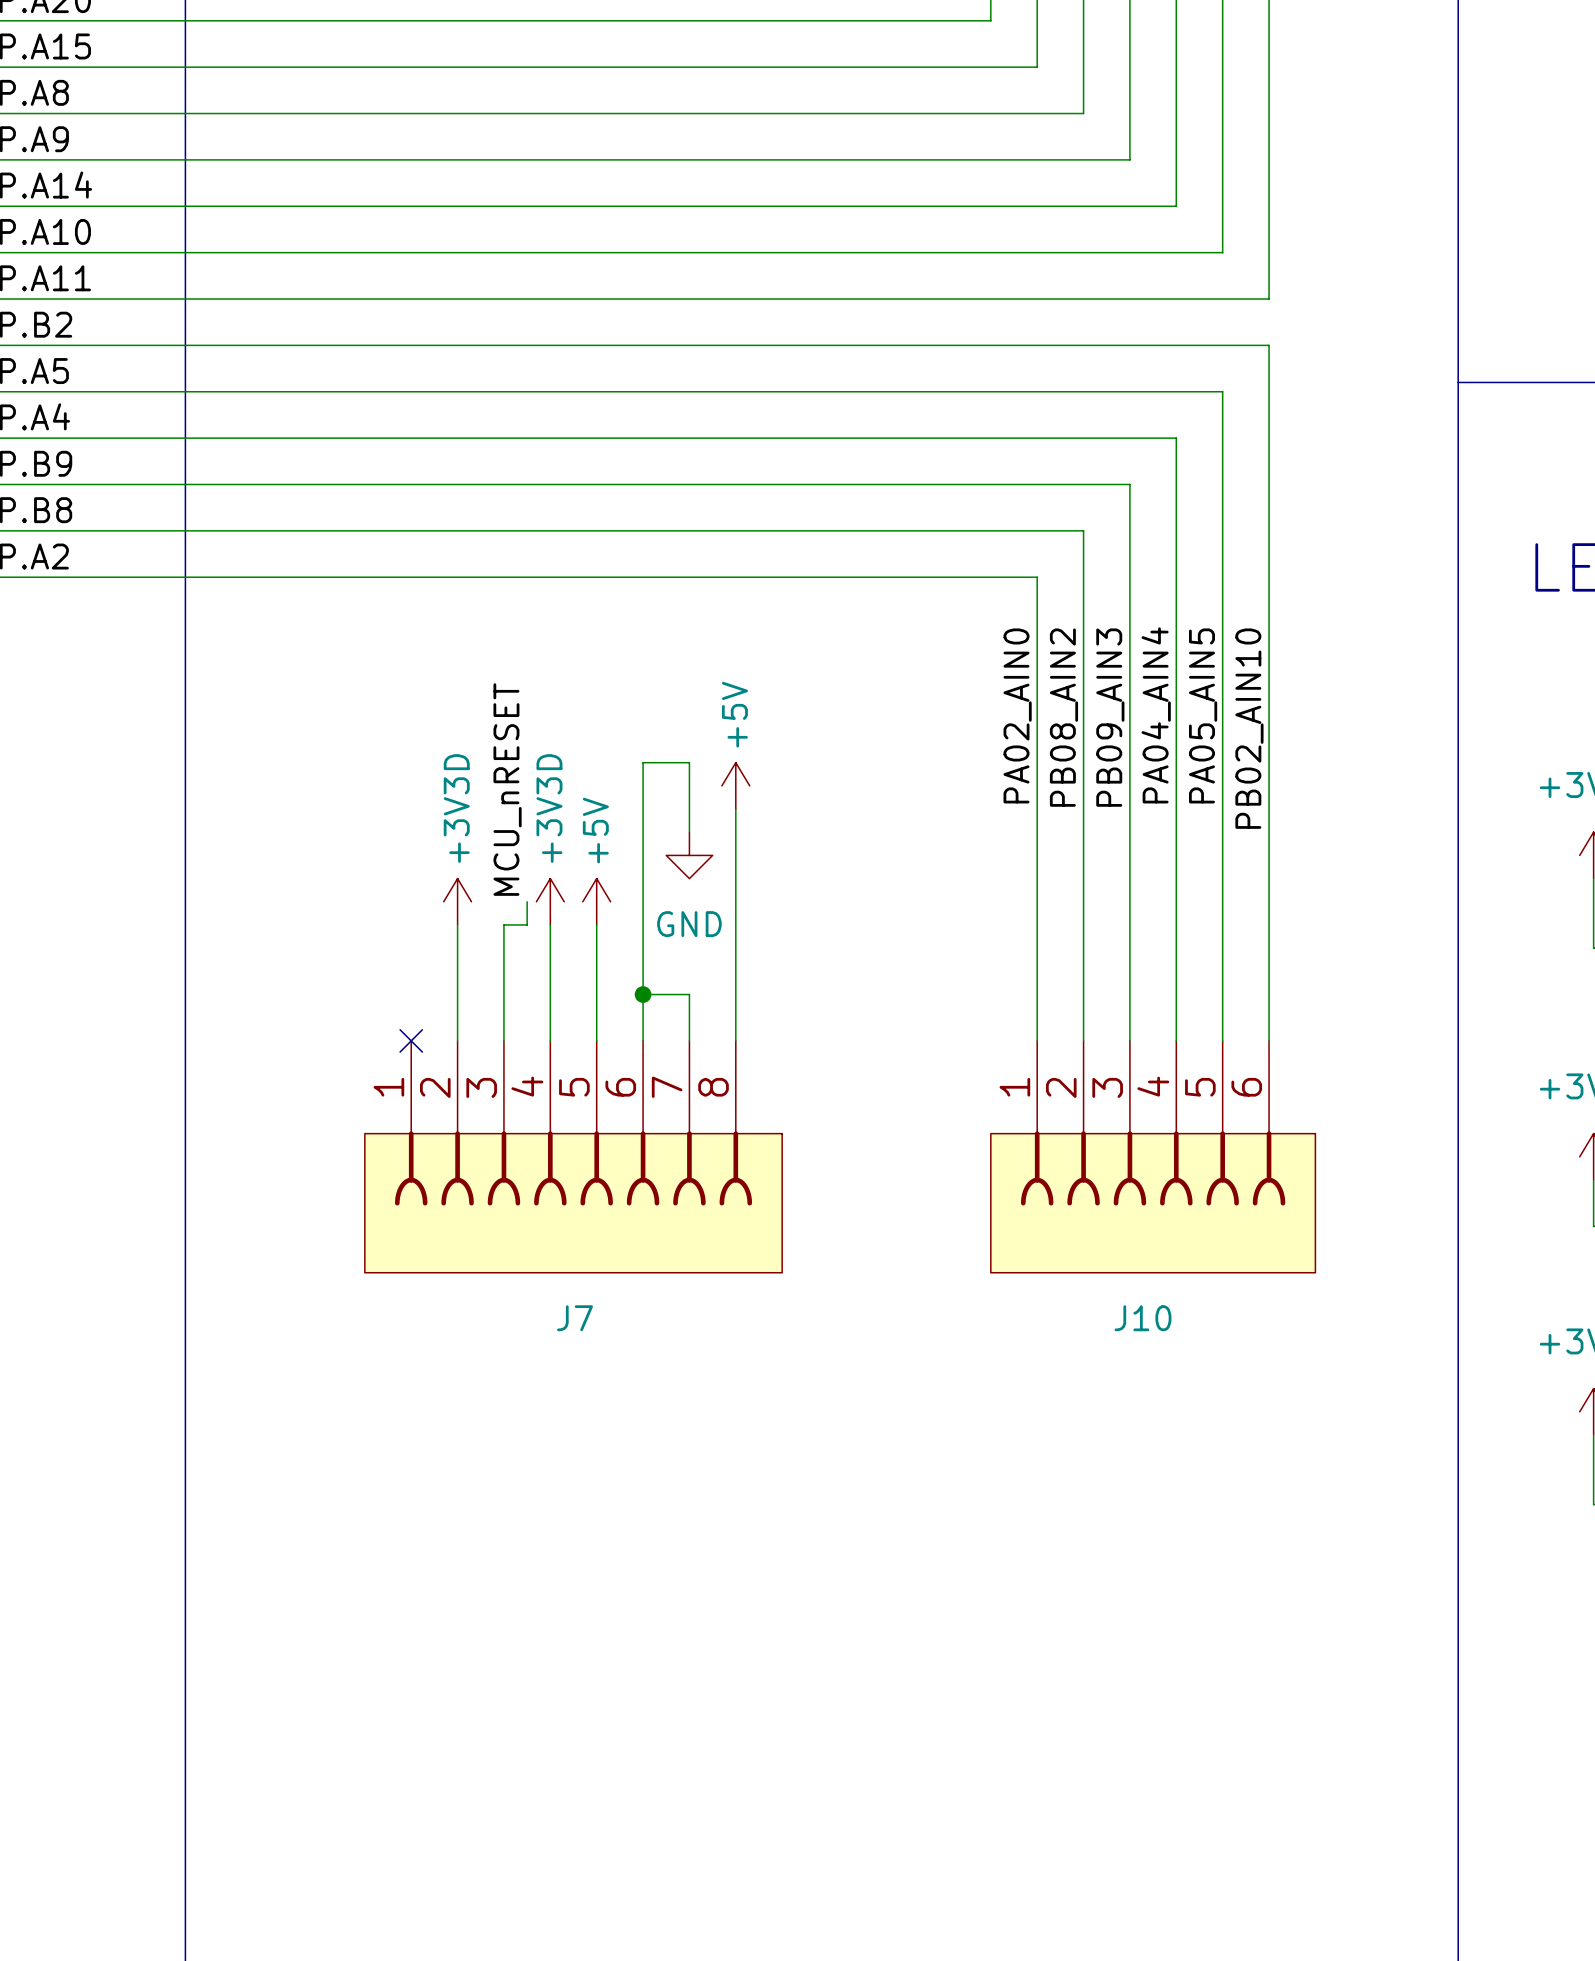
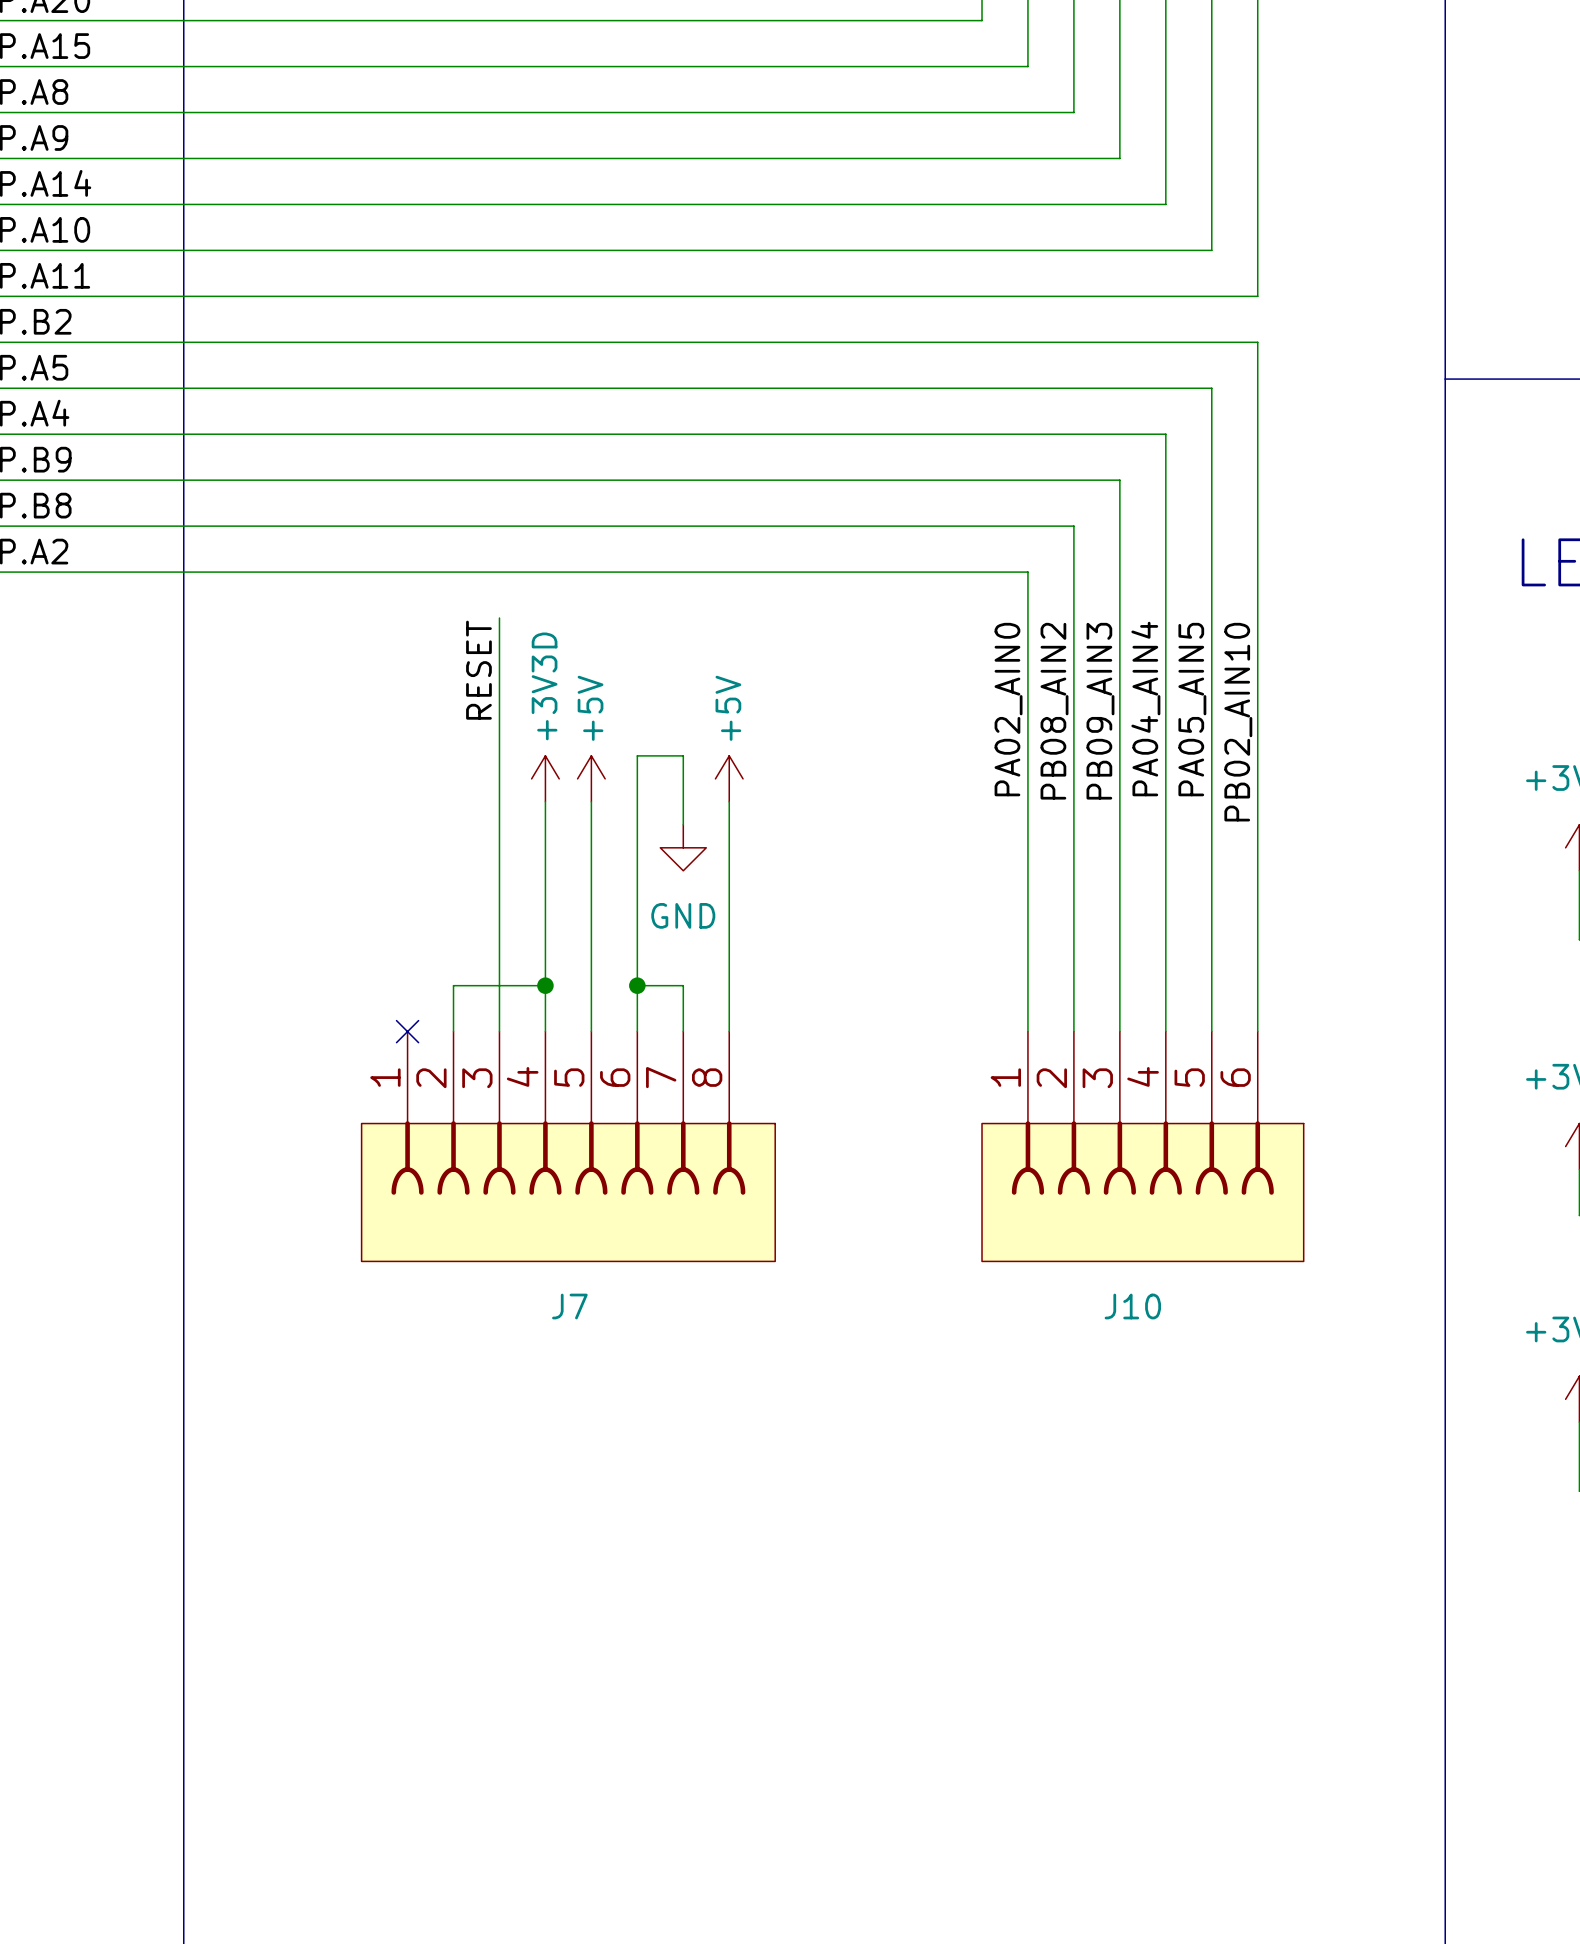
power symbol: none -> +3V3D (545, 778)
label: MCU_nRESET (507, 789) -> RESET (478, 670)
wire: none -> (545, 801) (545, 916)
wire: none -> (591, 801) (591, 916)
power symbol: +3V3D (457, 901) -> none
wire: (527, 901) (527, 924) (503, 924) -> (499, 618) (499, 916)
power symbol: +3V3D (550, 901) -> none
power symbol position: +5V (596, 901) -> +5V (591, 778)
wire: (457, 924) (457, 994) -> (545, 985) (453, 985)
junction: none -> (545, 985)

